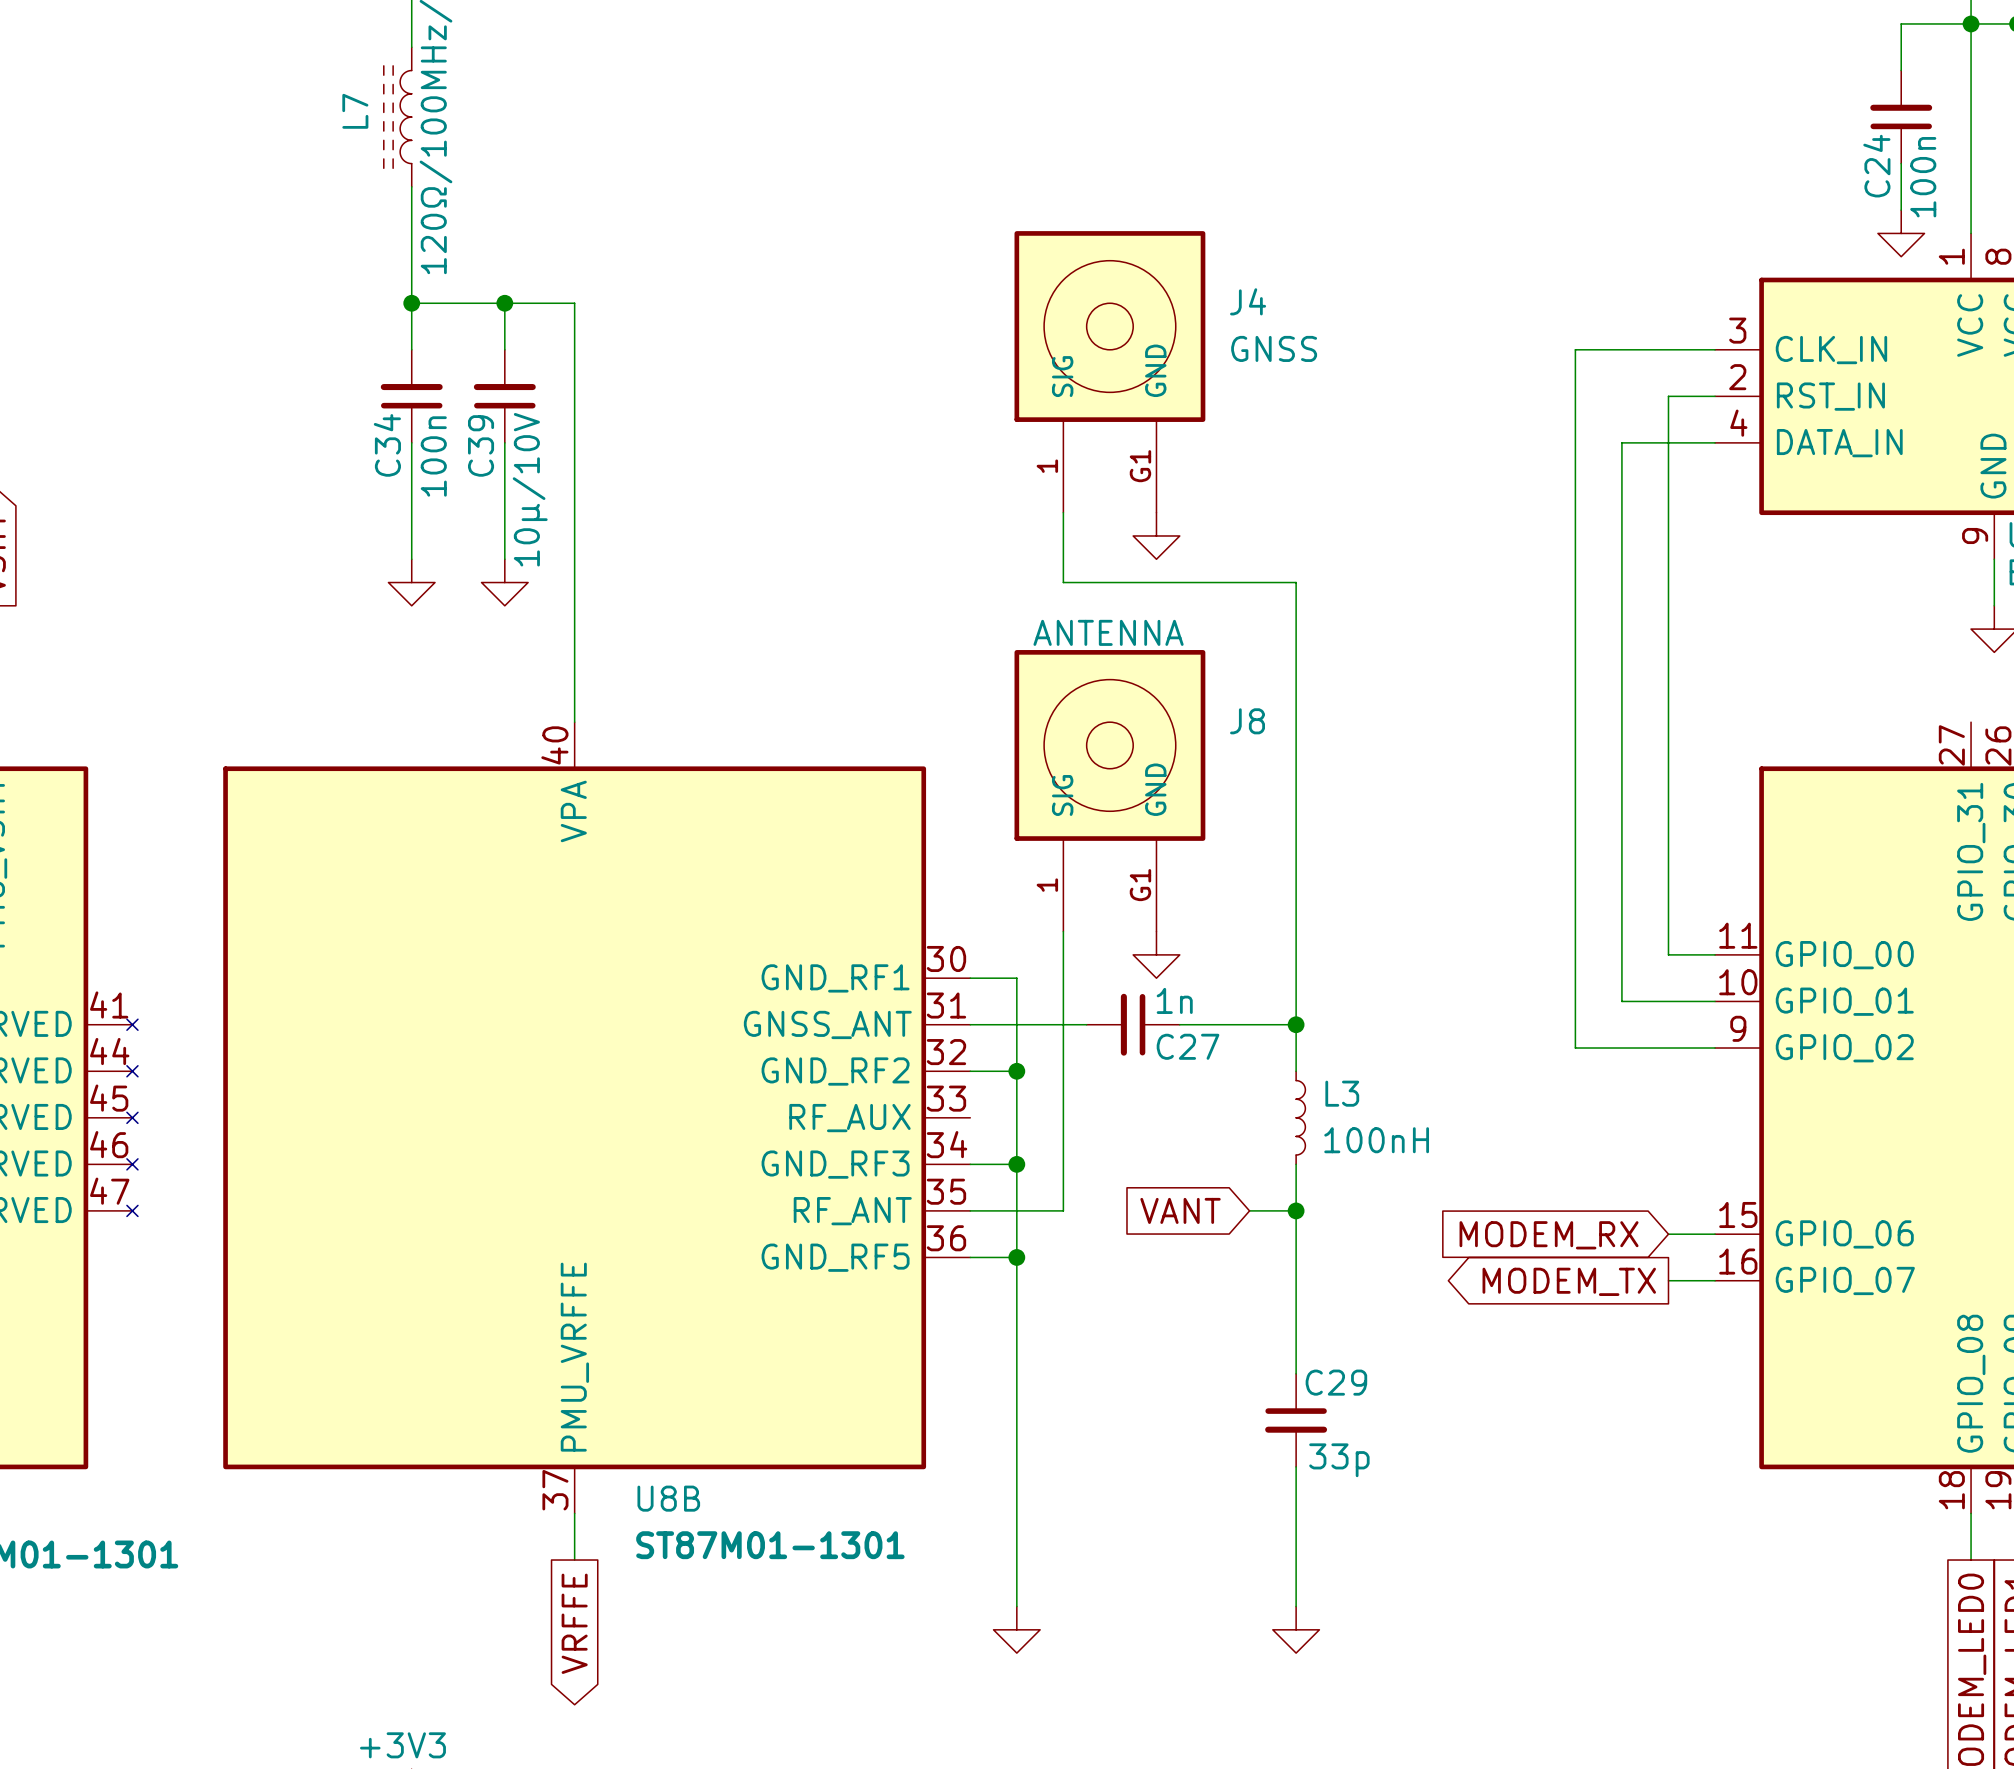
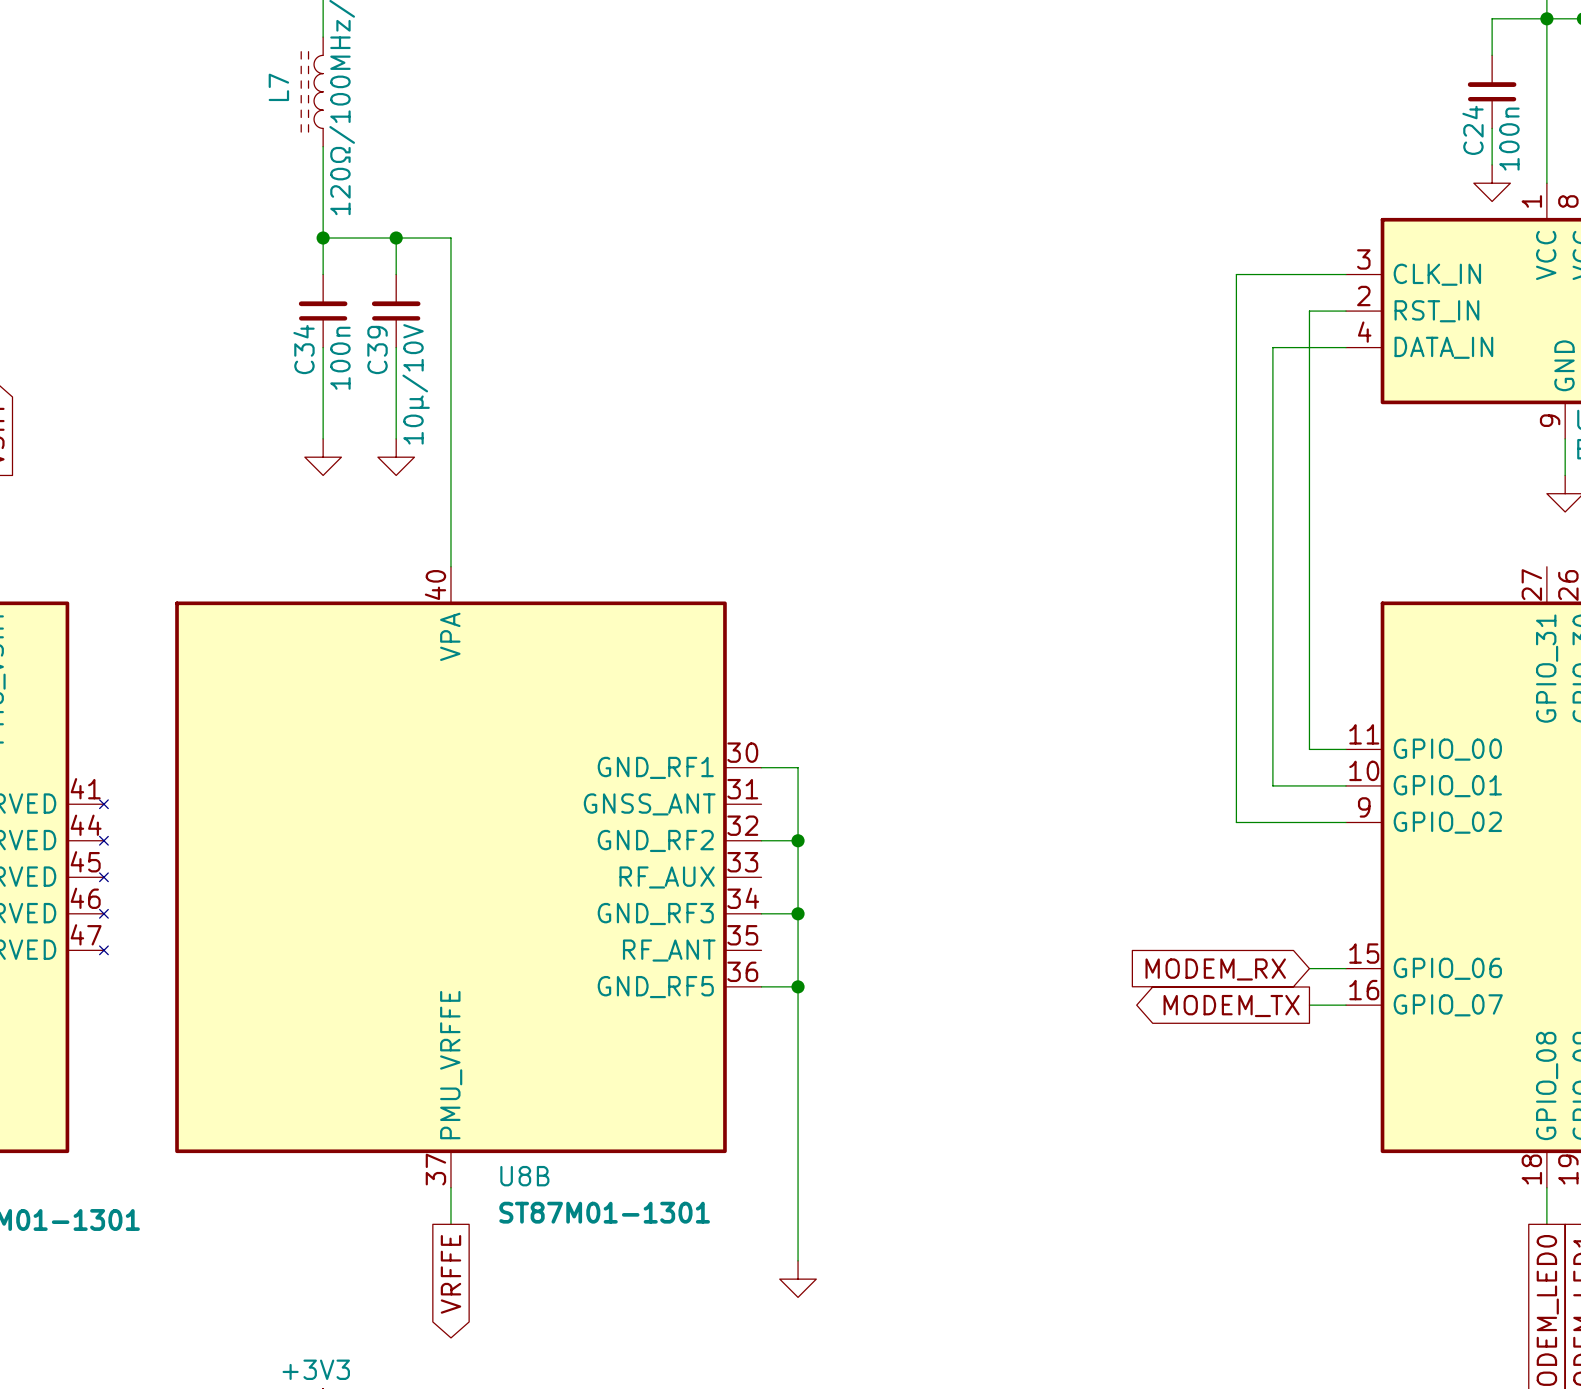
J4: GNSS (1109, 371) -> none
wire: (1063, 512) (1063, 582) (1296, 582) (1296, 1071) -> none
power symbol: (1156, 535) -> none
J8: ANTENNA (1109, 790) -> none
wire: (1063, 931) (1063, 1210) (970, 1210) -> none
power symbol: (1156, 954) -> none
wire: (970, 1024) (1086, 1024) -> none
C27: 1n (1133, 1024) -> none
wire: (1179, 1024) (1296, 1024) -> none
junction: (1296, 1024) -> none
L3: 100nH (1300, 1117) -> none
wire: (1296, 1164) (1296, 1373) -> none
global label: VANT (1180, 1210) -> none
wire: (1249, 1210) (1296, 1210) -> none
junction: (1296, 1210) -> none
C29: 33p (1296, 1420) -> none
wire: (1296, 1466) (1296, 1606) -> none
power symbol: (1296, 1629) -> none

